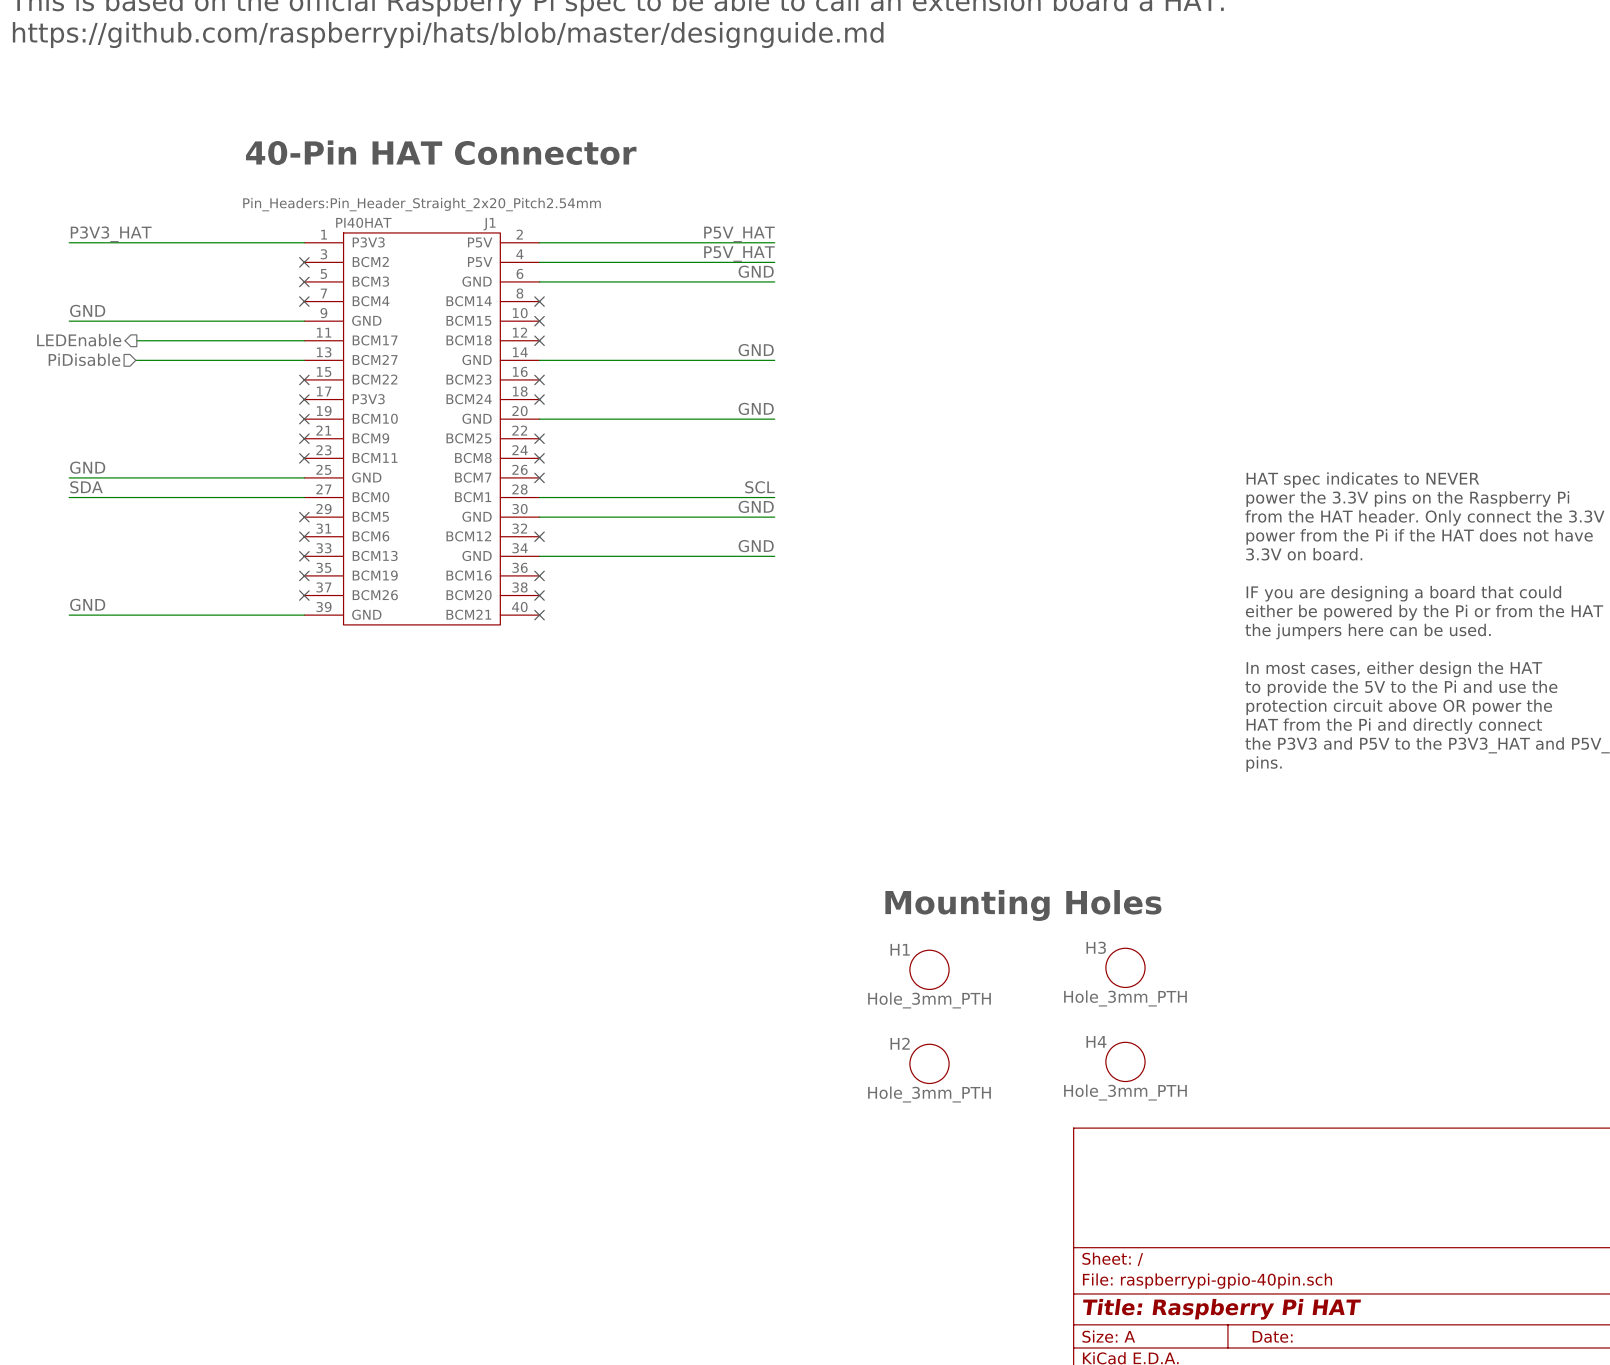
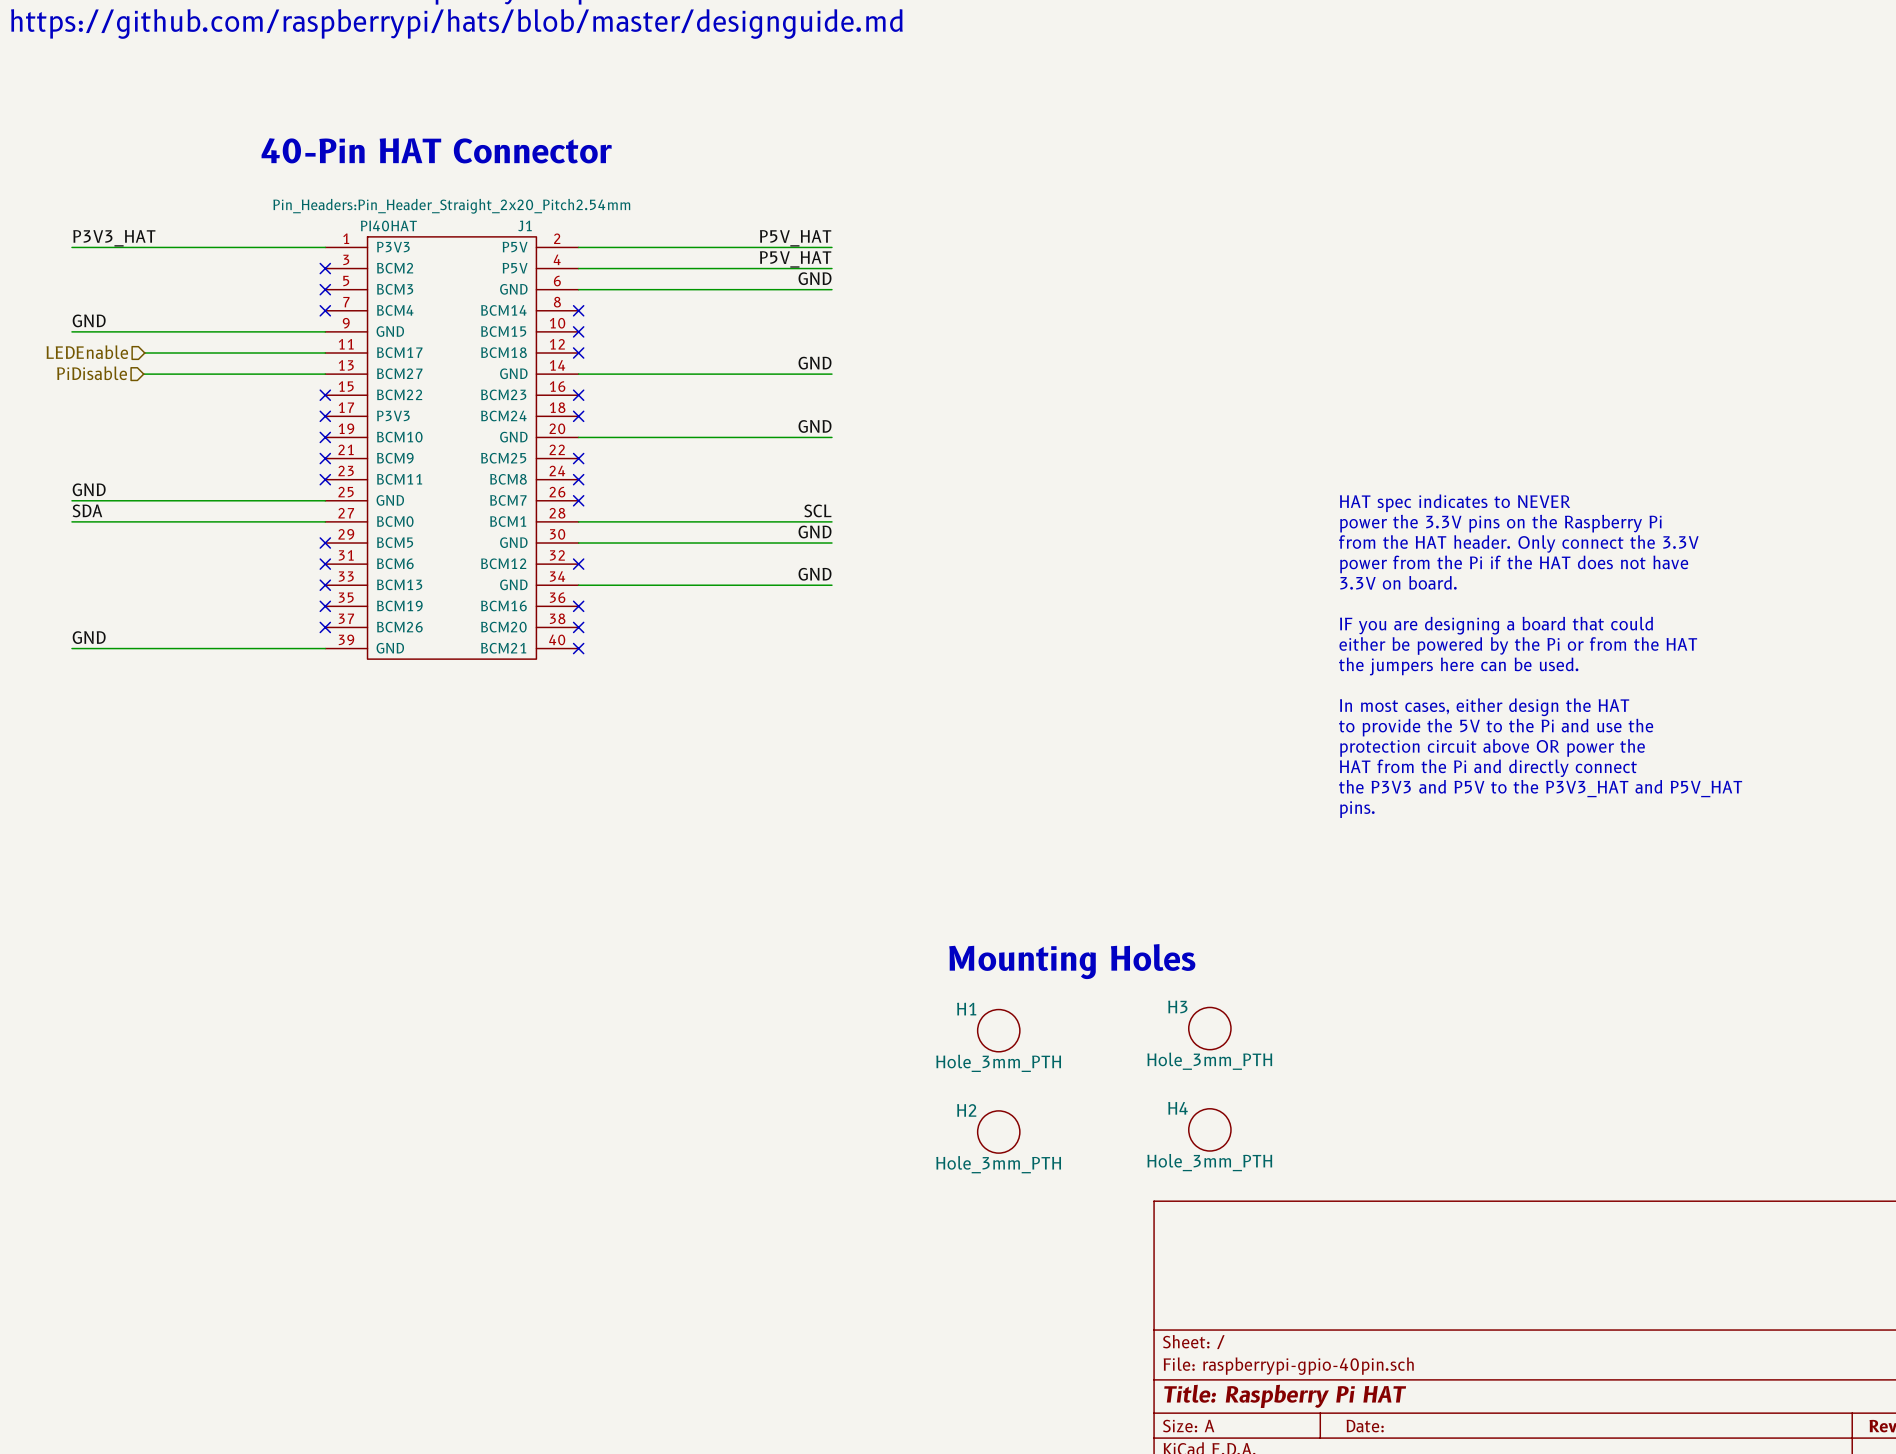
hierarchical label shape: output (79, 340) -> input (87, 352)

